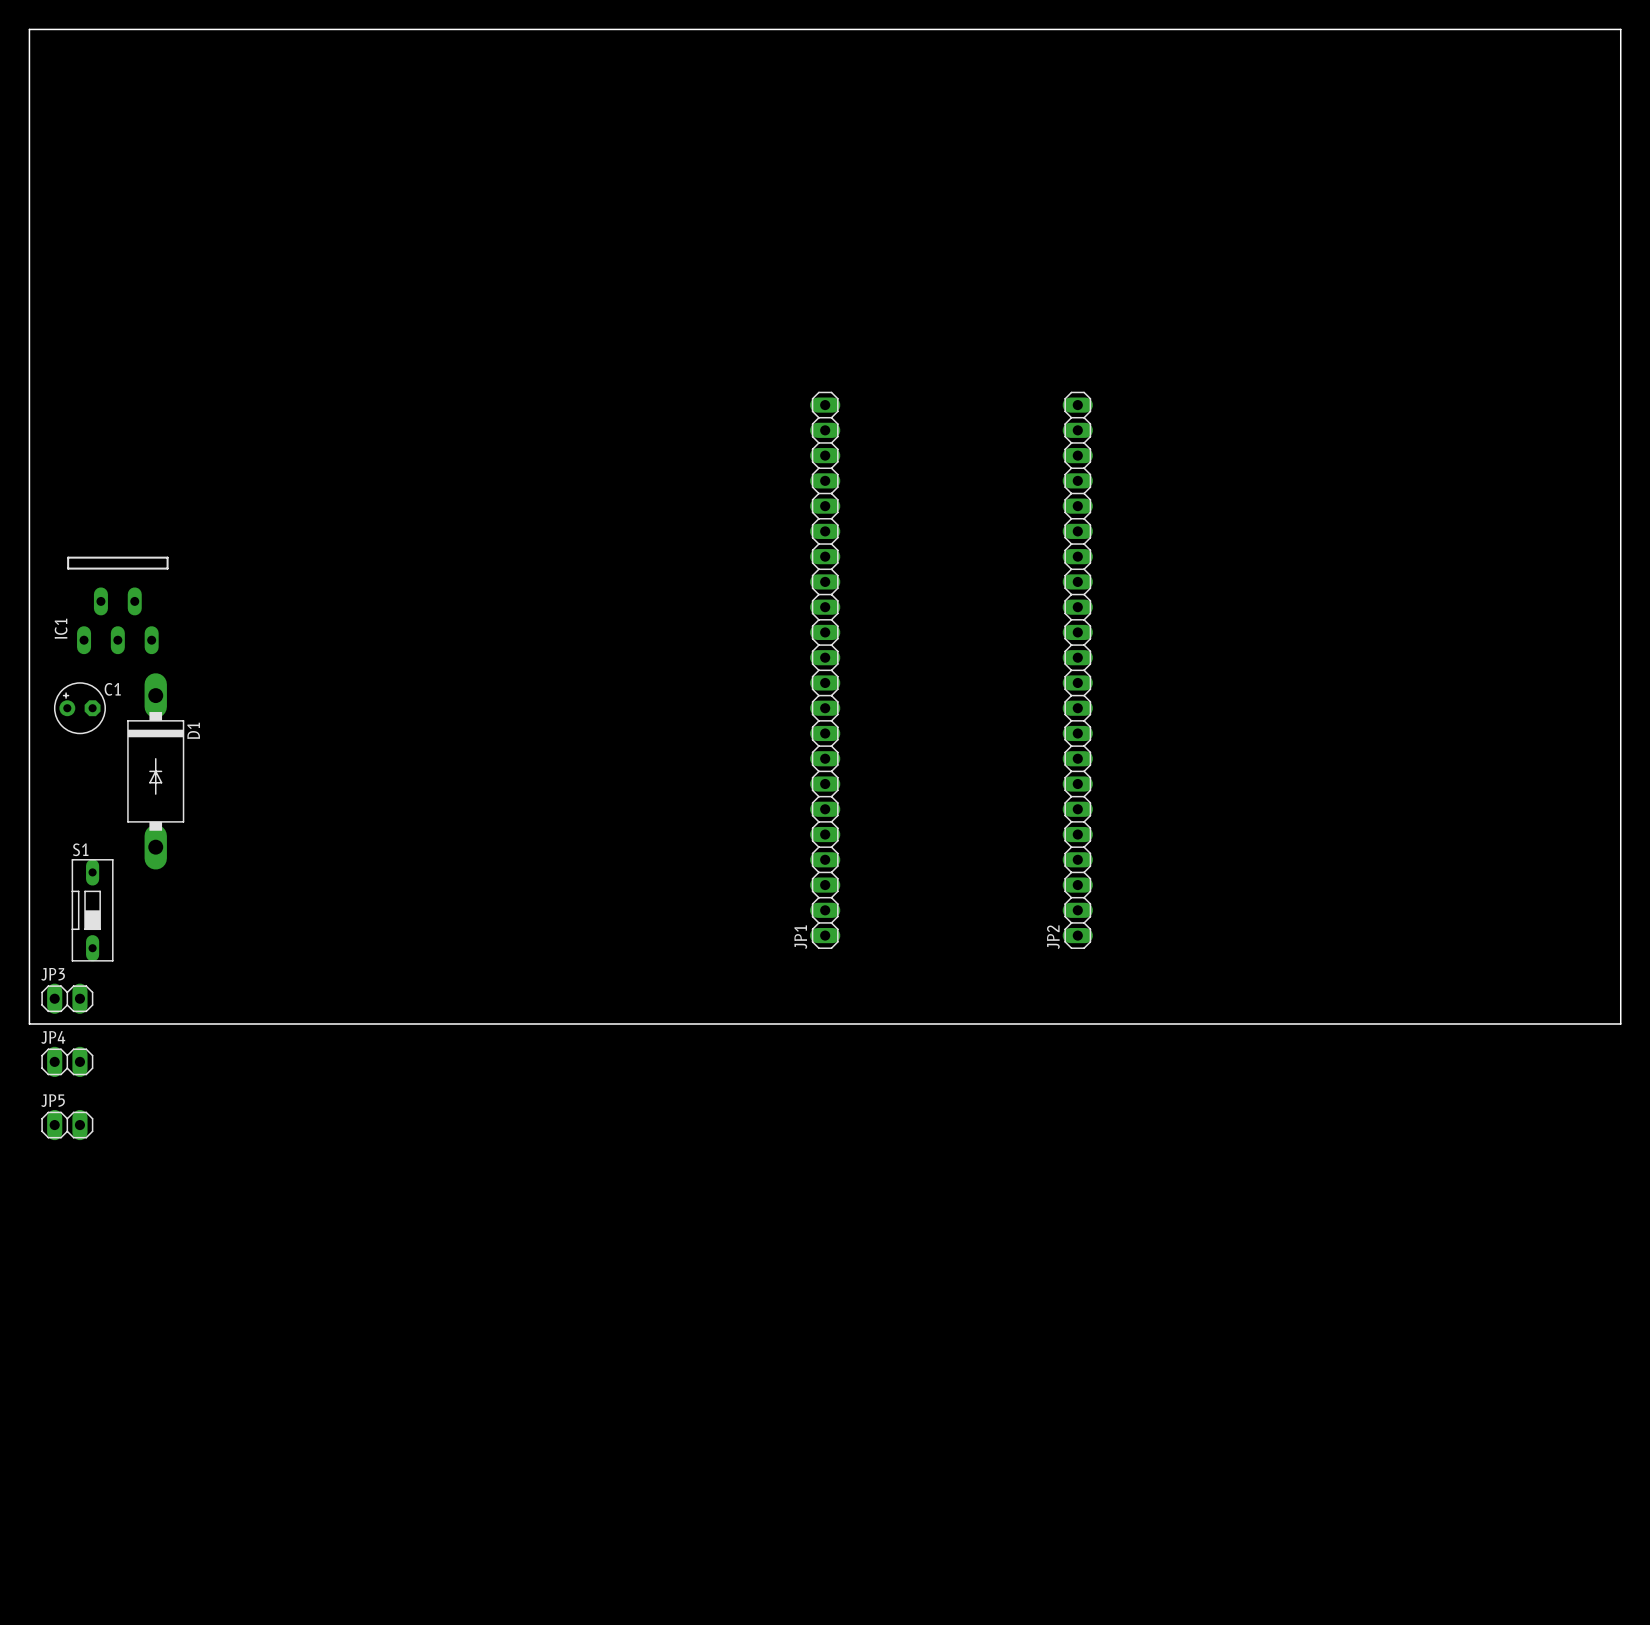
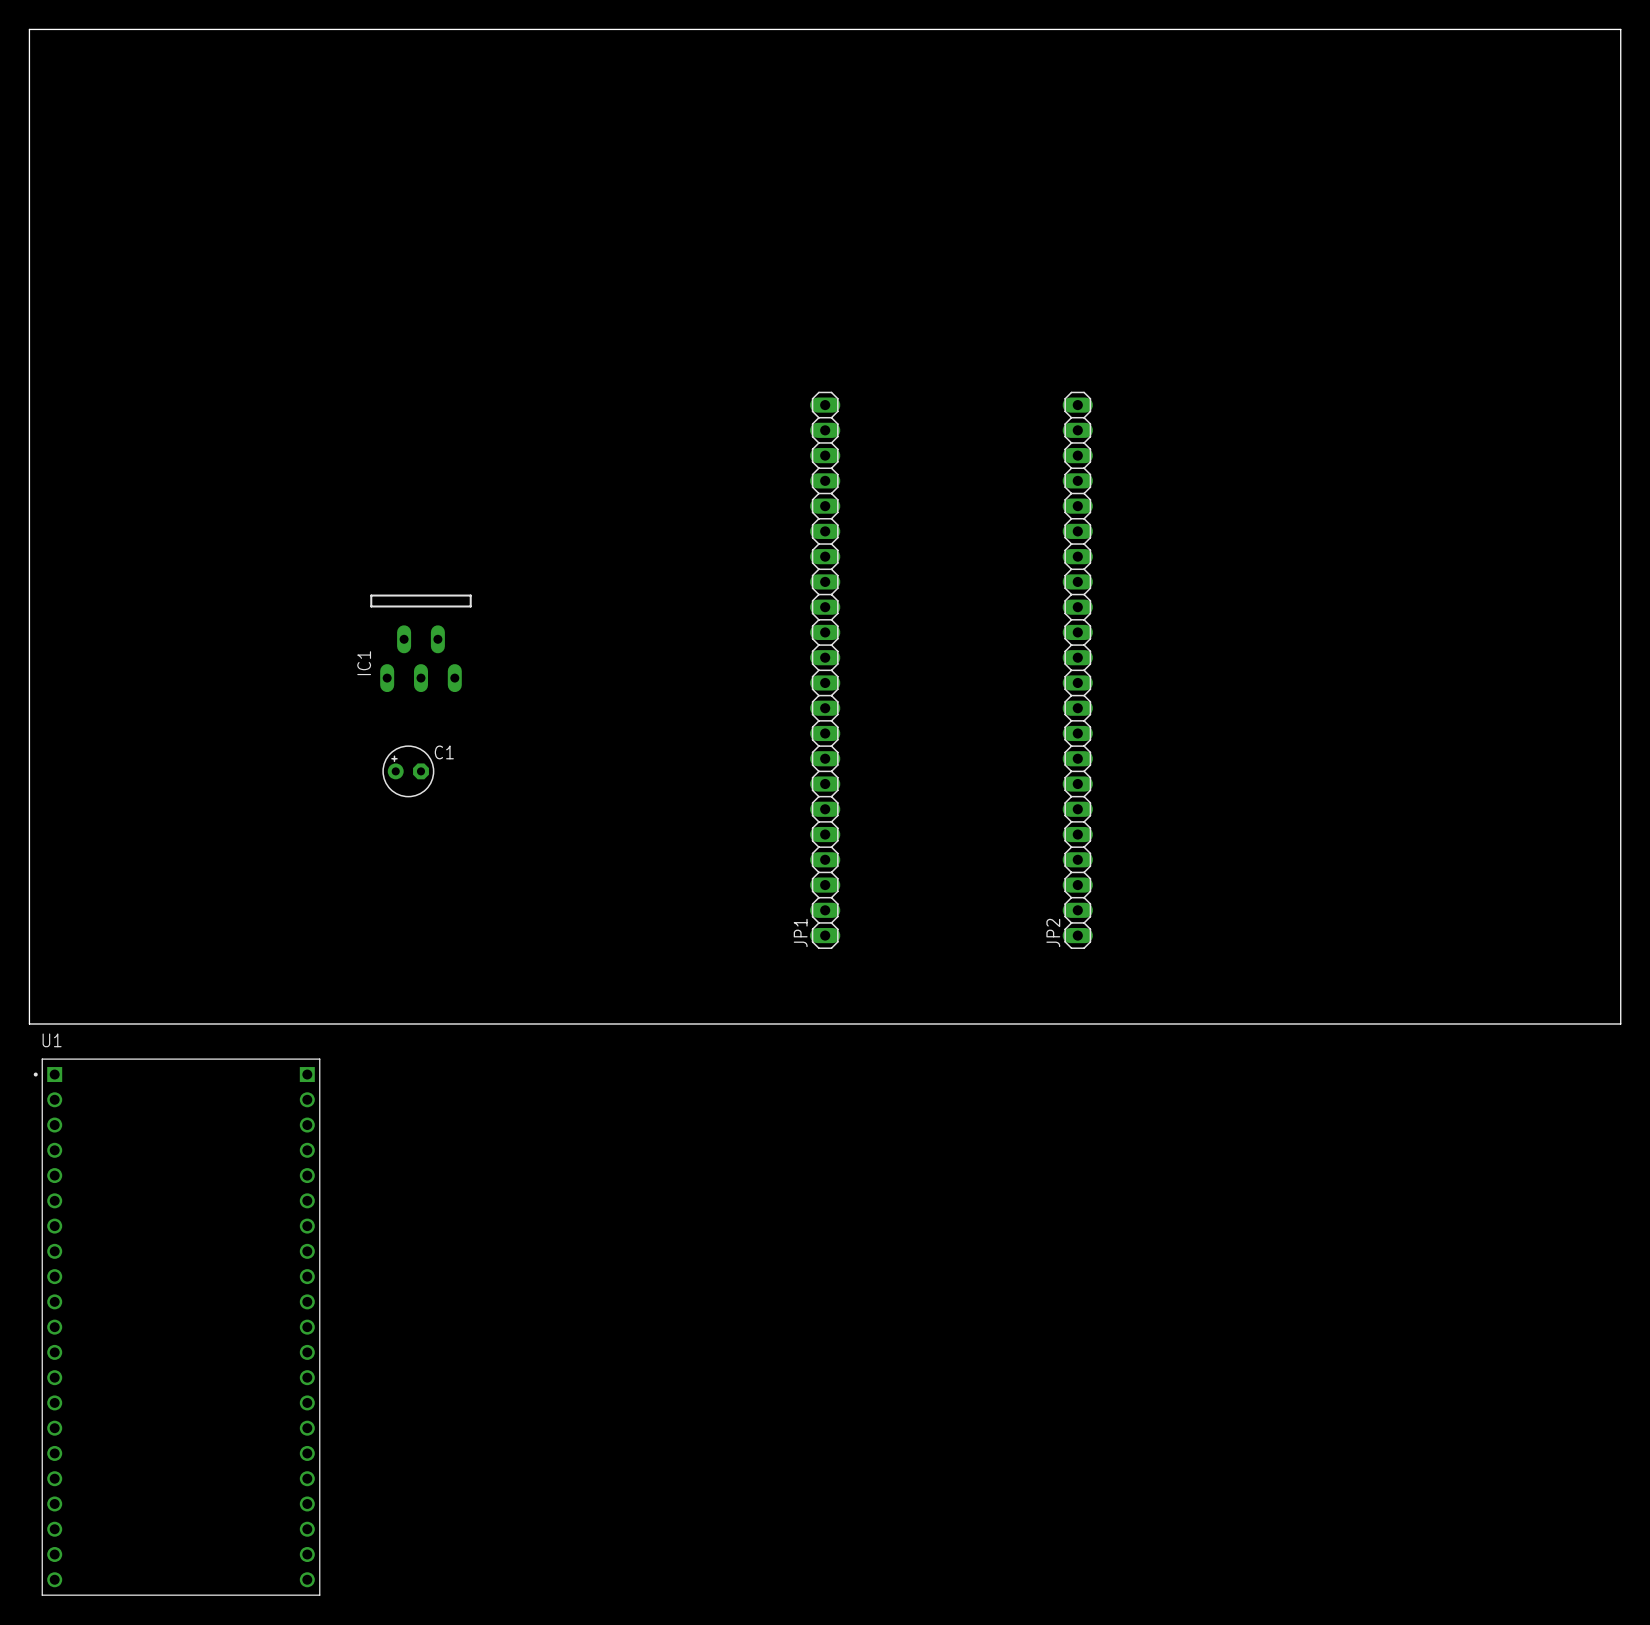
IC1 position: (117, 605) -> (420, 643)
C1 position: (79, 708) -> (408, 771)
D1: (155, 771) -> none
S1: (92, 910) -> none
JP3: (67, 998) -> none
JP4: (67, 1061) -> none
JP5: (67, 1125) -> none
U1: none -> (177, 1327)

